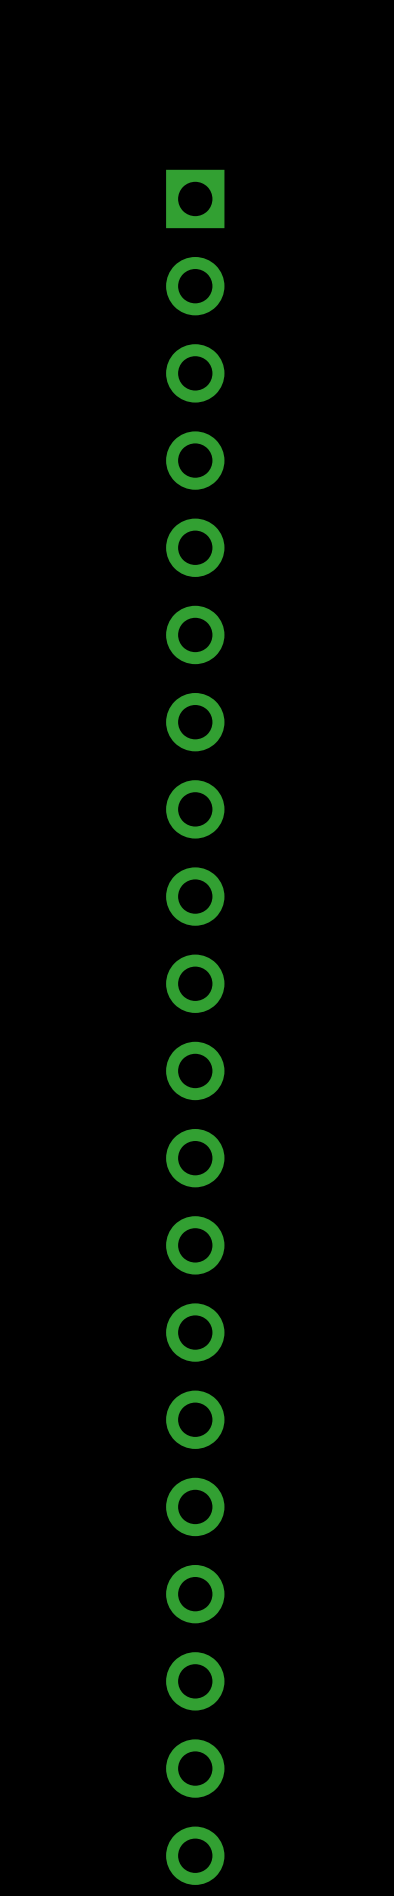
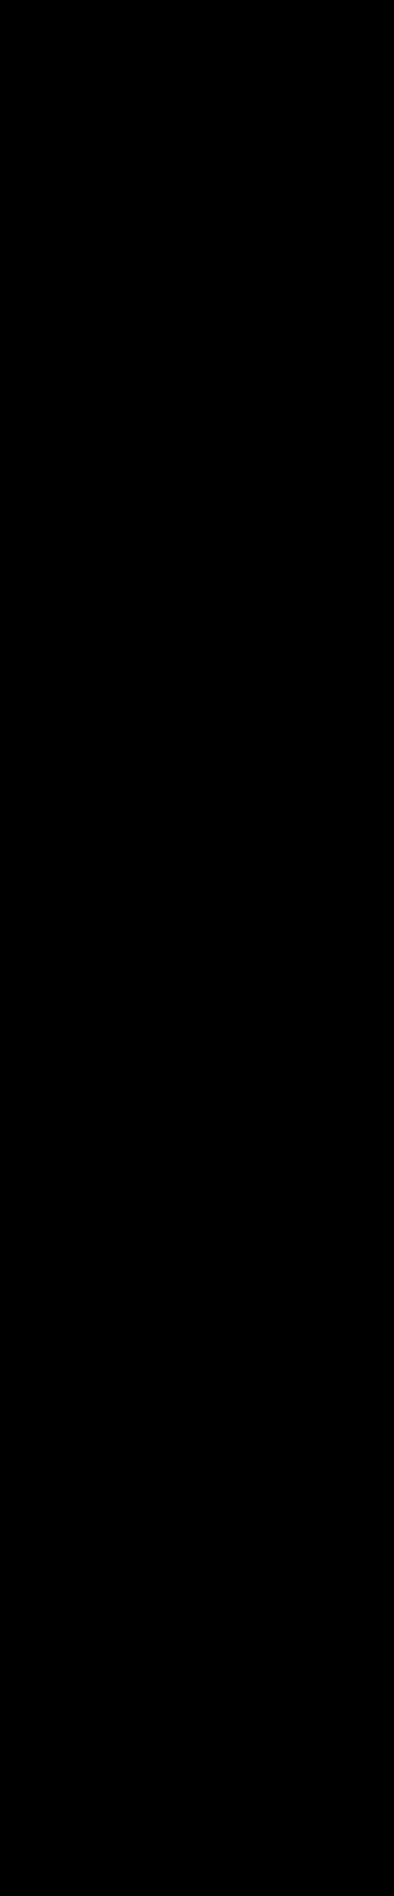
part: (195, 1027) -> none

